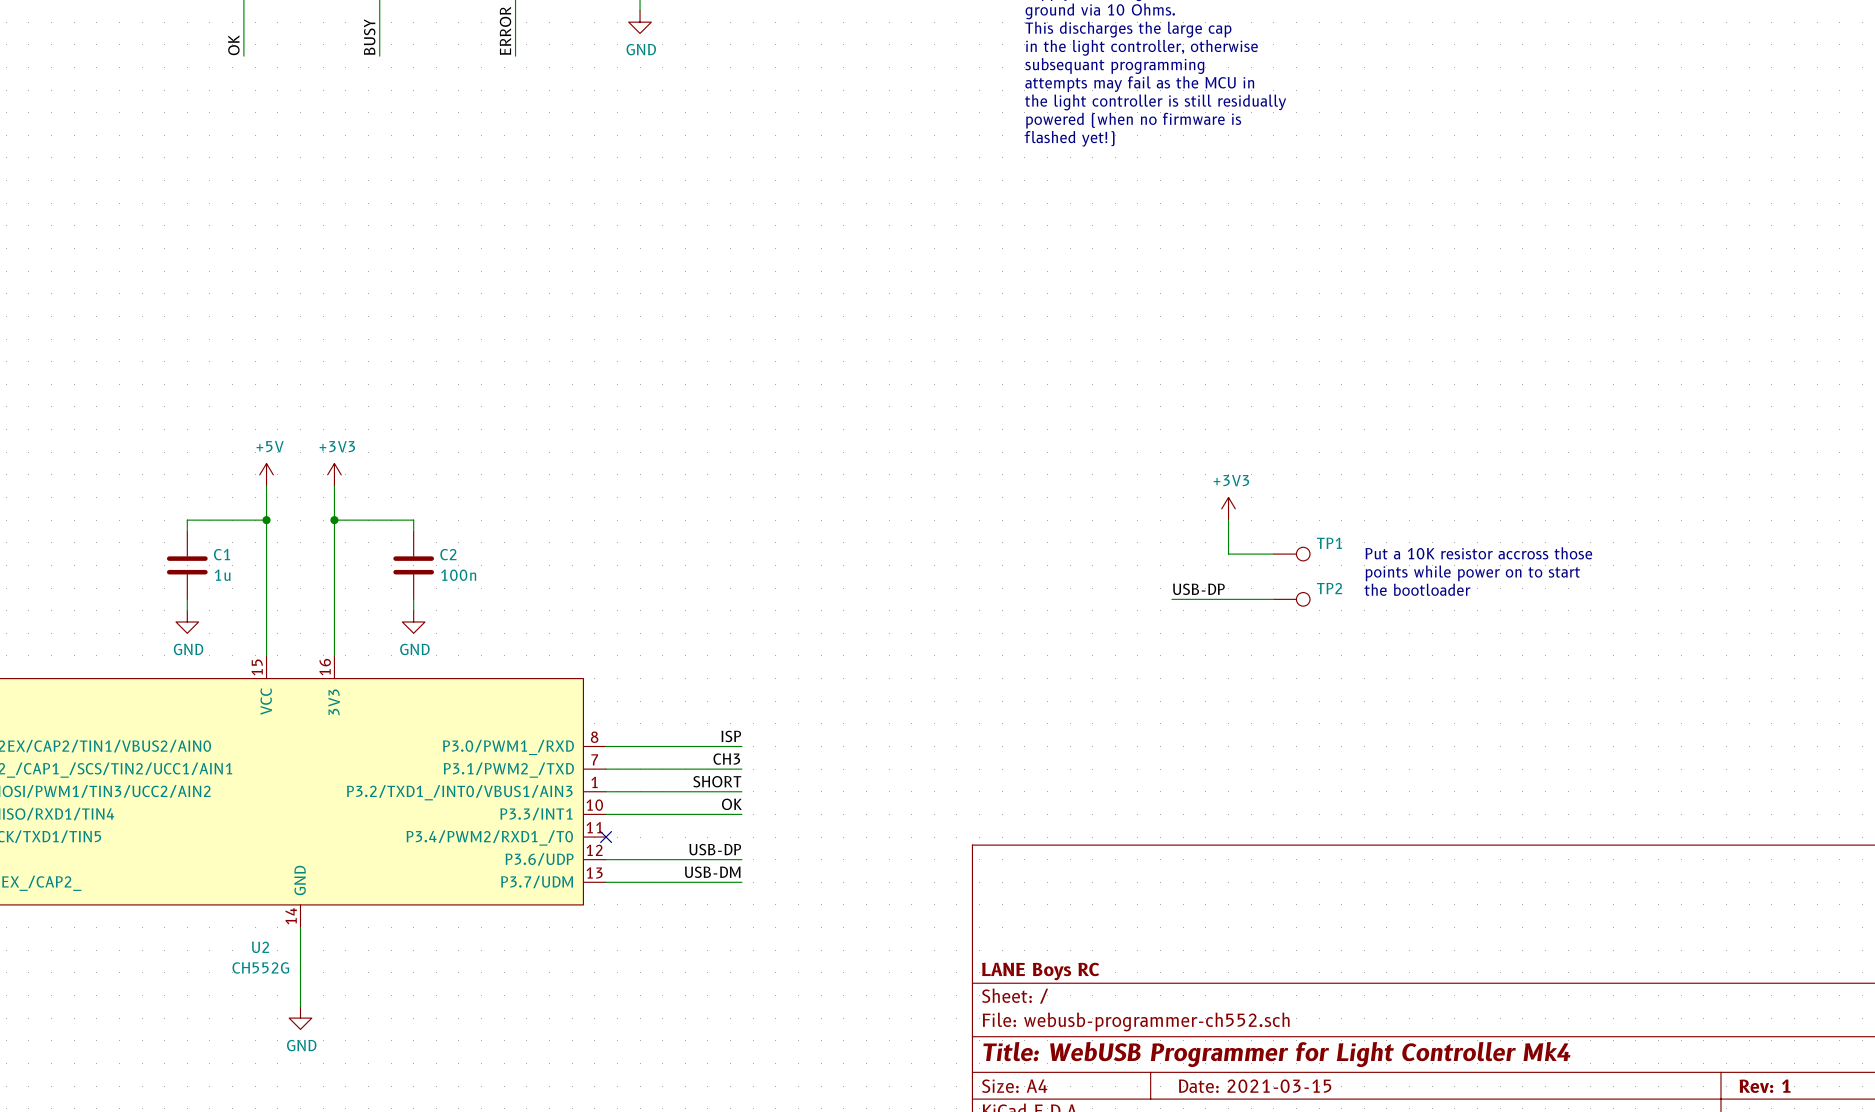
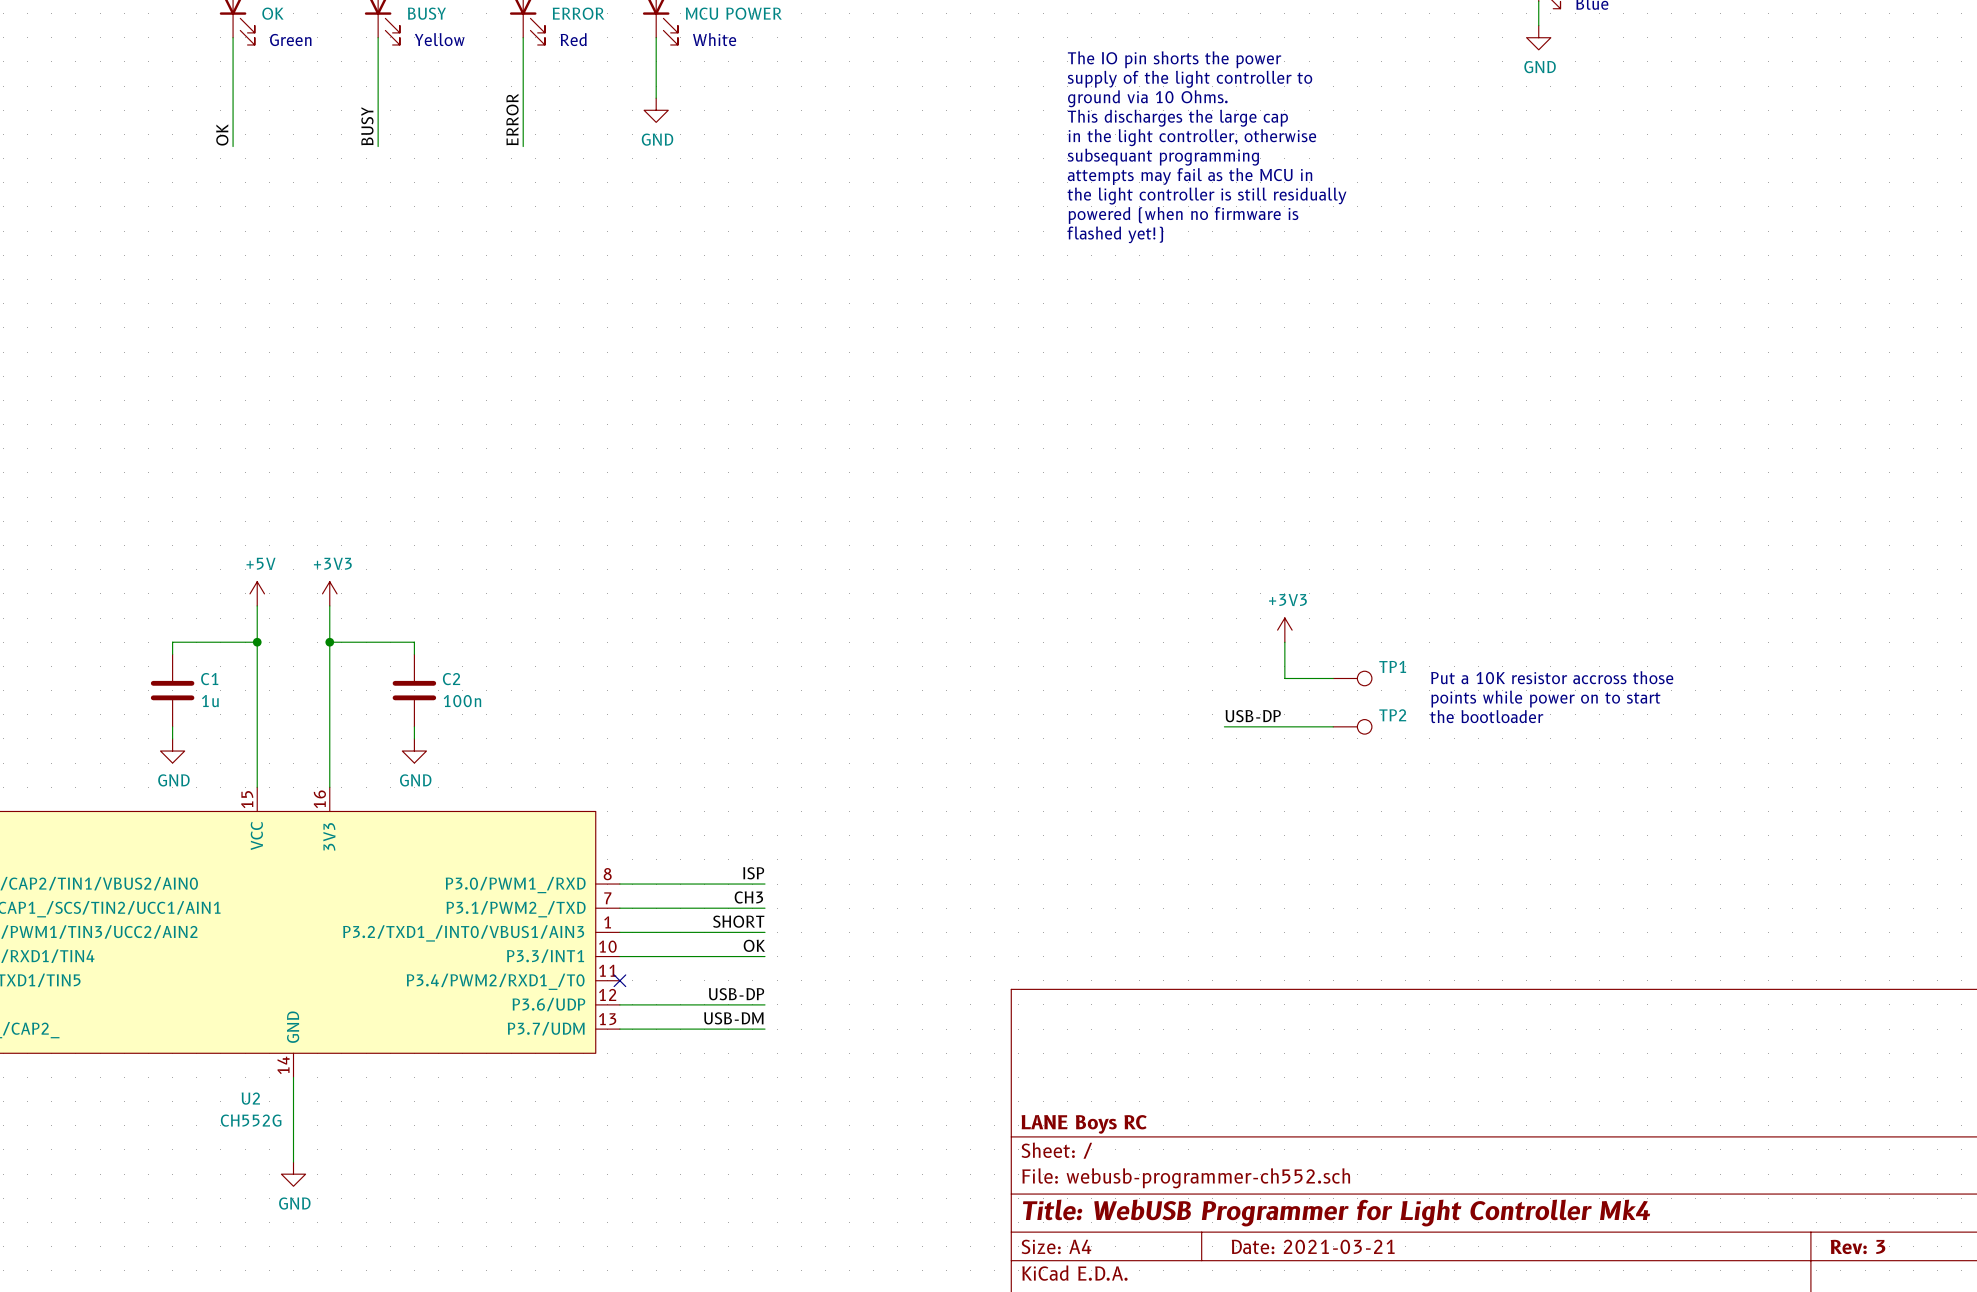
title block: Date: 2021-03-15 (1255, 1086) -> Date: 2021-03-21 (1313, 1246)
title block: Rev: 1 (1765, 1086) -> Rev: 3 (1858, 1247)

